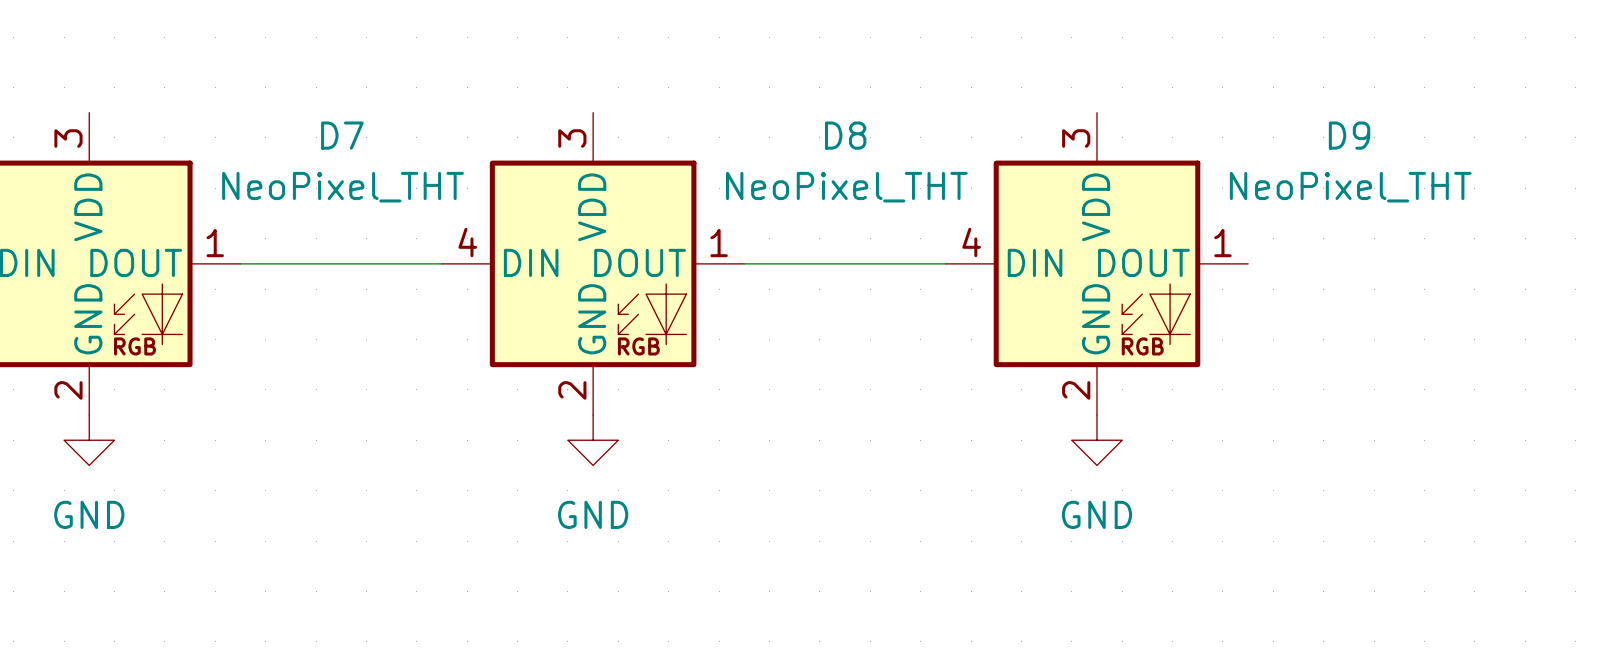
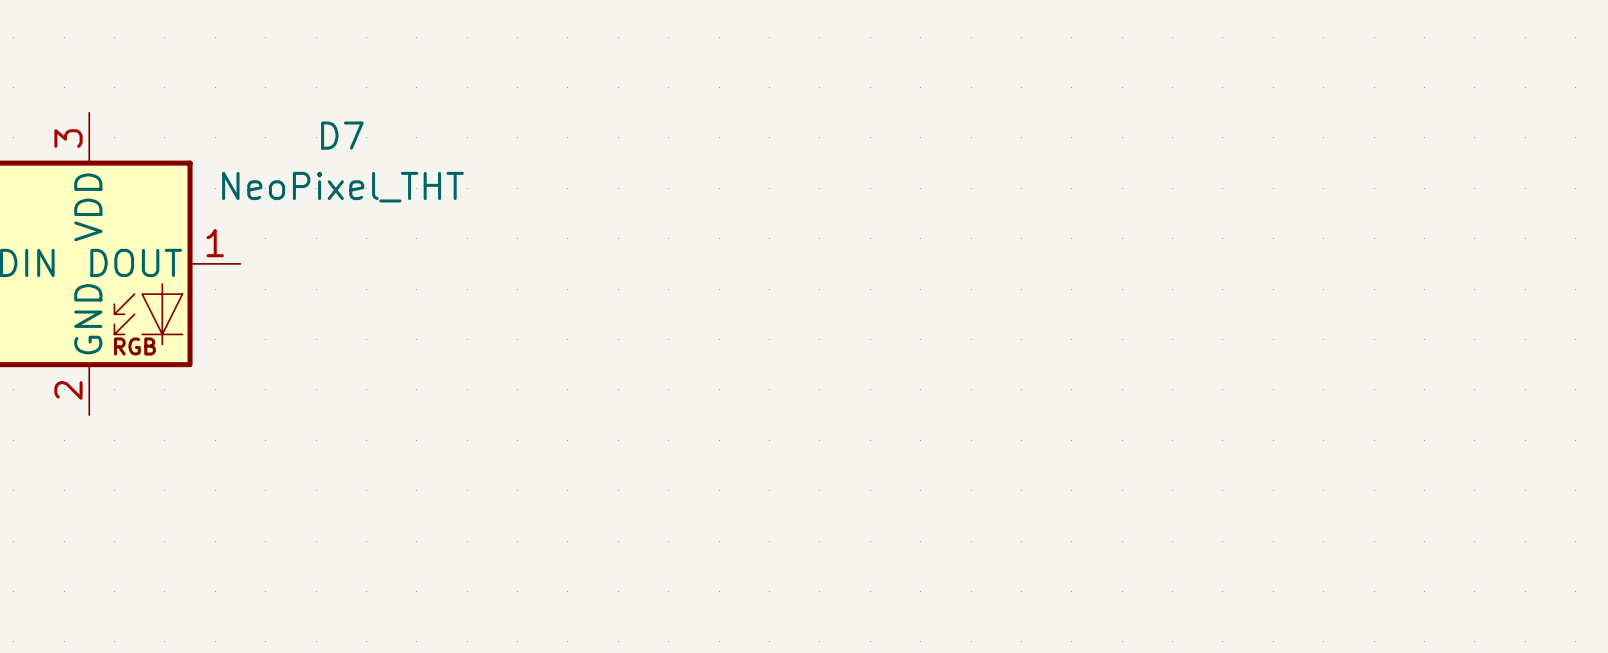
wire: (240, 263) (441, 263) -> none
D8: NeoPixel_THT (593, 263) -> none
wire: (744, 263) (945, 263) -> none
D9: NeoPixel_THT (1097, 263) -> none
power symbol: GND (89, 440) -> none
power symbol: GND (593, 440) -> none
power symbol: GND (1097, 440) -> none

